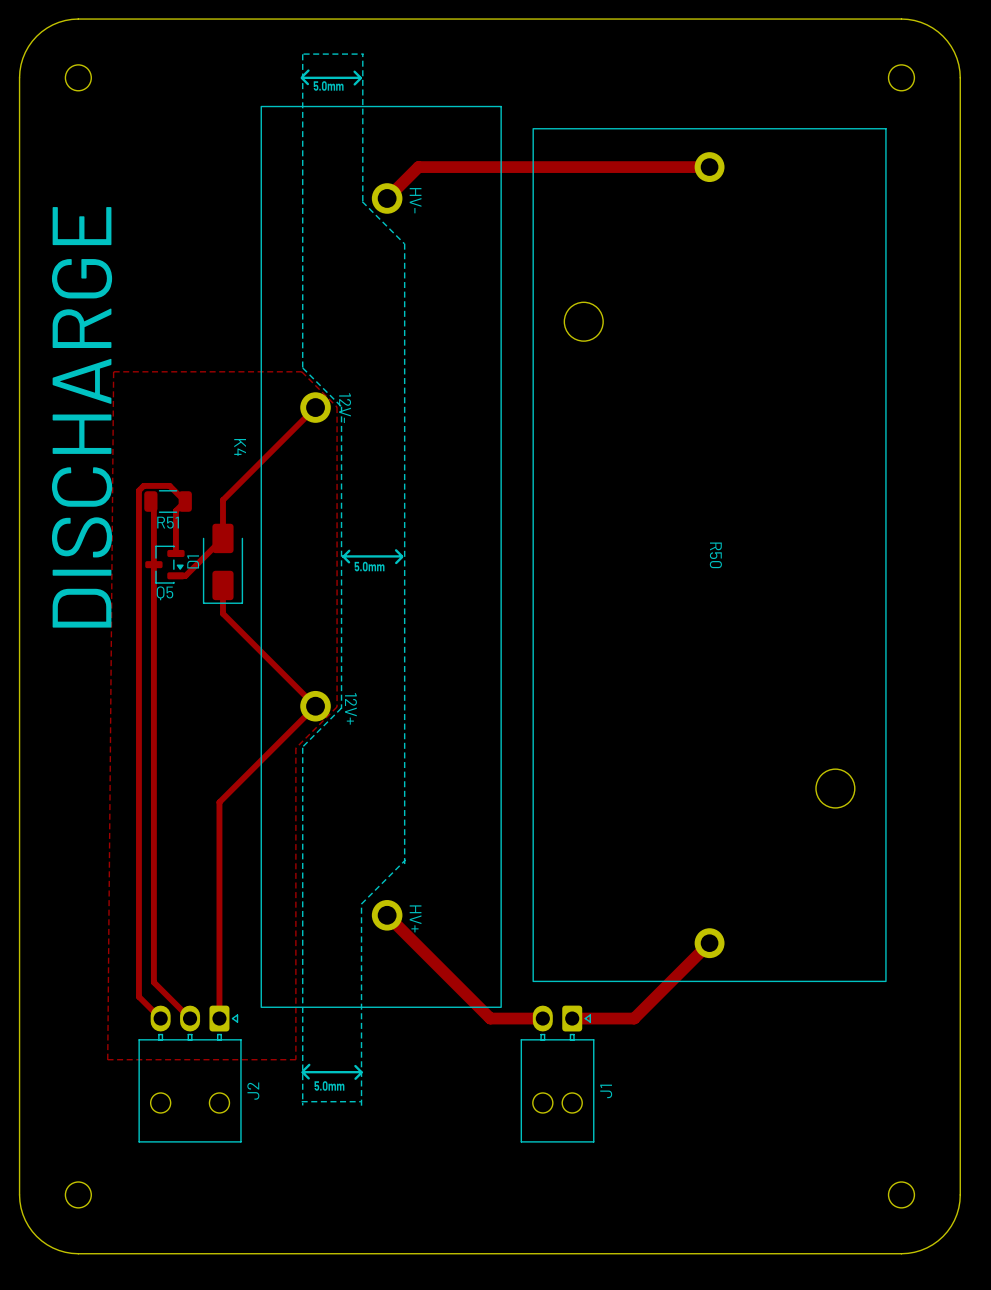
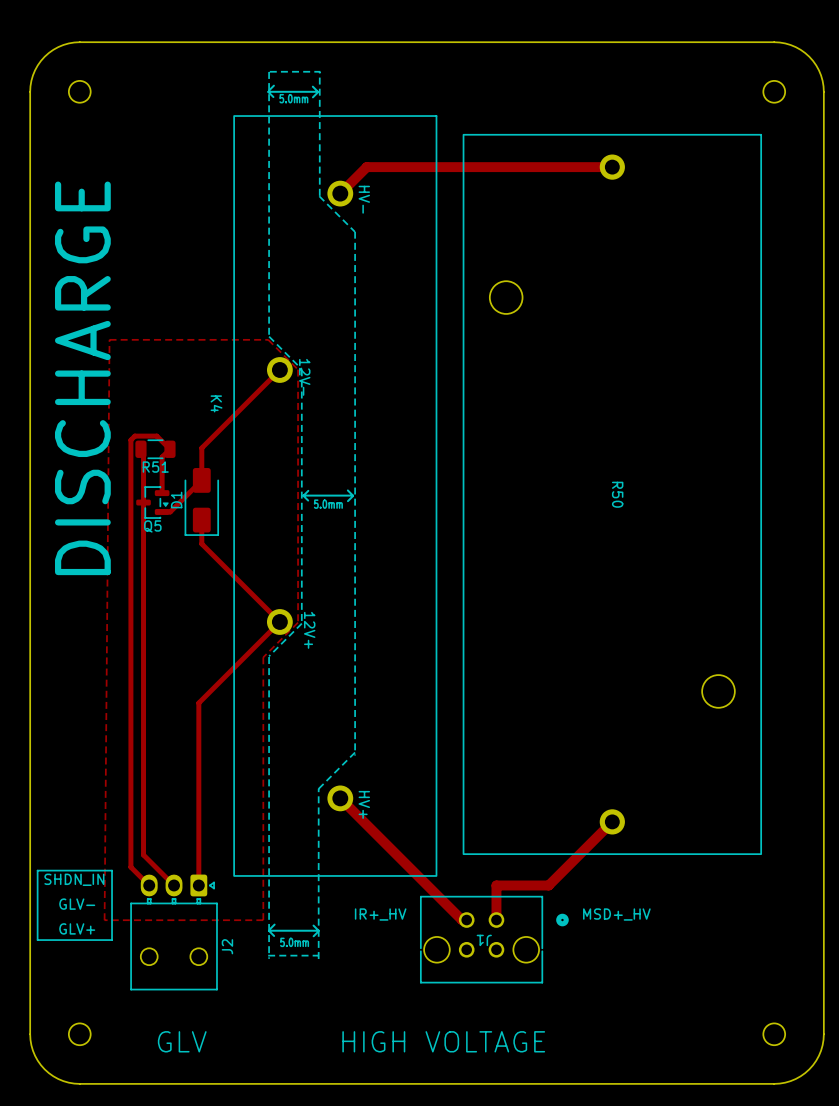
line: none -> (37, 870) (112, 870) (112, 940) (37, 940) (37, 870)
J1 footprint: [520, 1005, 595, 1143] -> [420, 895, 569, 984]
text: none -> SHDN_IN (74, 879)
top track: (490, 1018) (542, 1018) -> (427, 885) (461, 920) (466, 920)
top track: none -> (496, 885) (496, 920)
text: none -> GLV- (77, 904)
text: none -> IR+_HV (380, 914)
text: none -> MSD+_HV (616, 914)
text: none -> GLV+ (77, 928)
J1 name position: J1 (606, 1091) -> J1 (484, 940)
text: none -> GLV (182, 1041)
text: none -> HIGH VOLTAGE (443, 1041)

